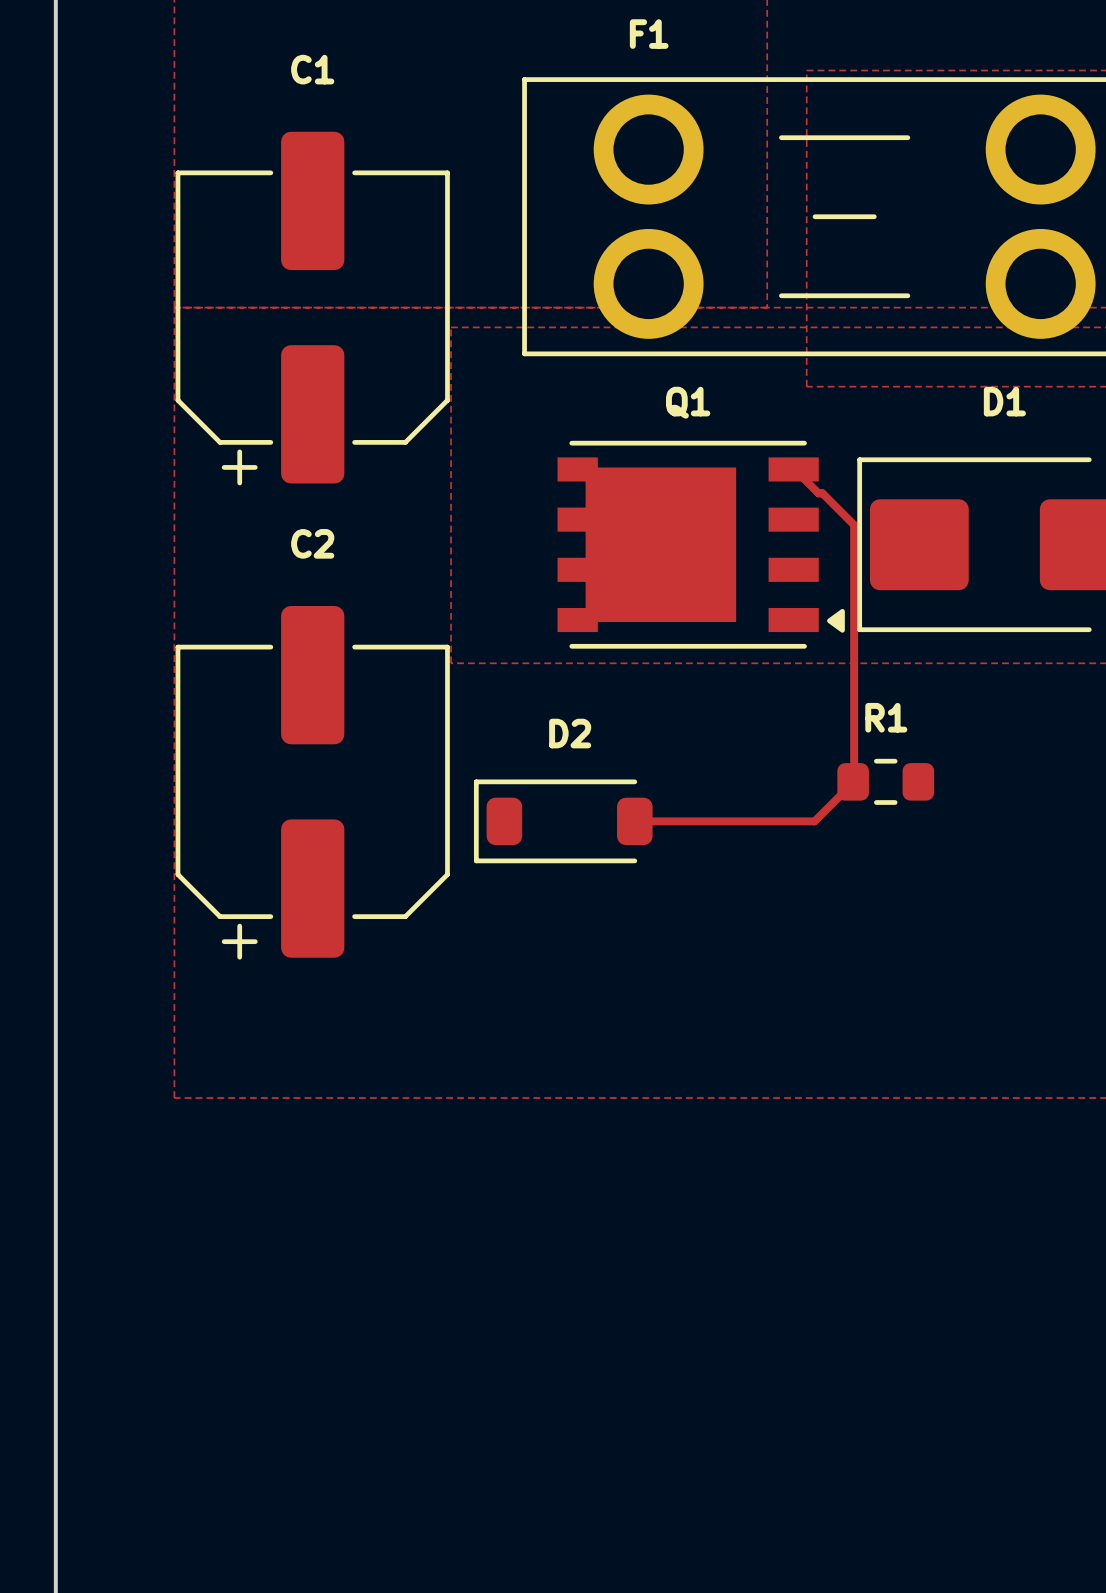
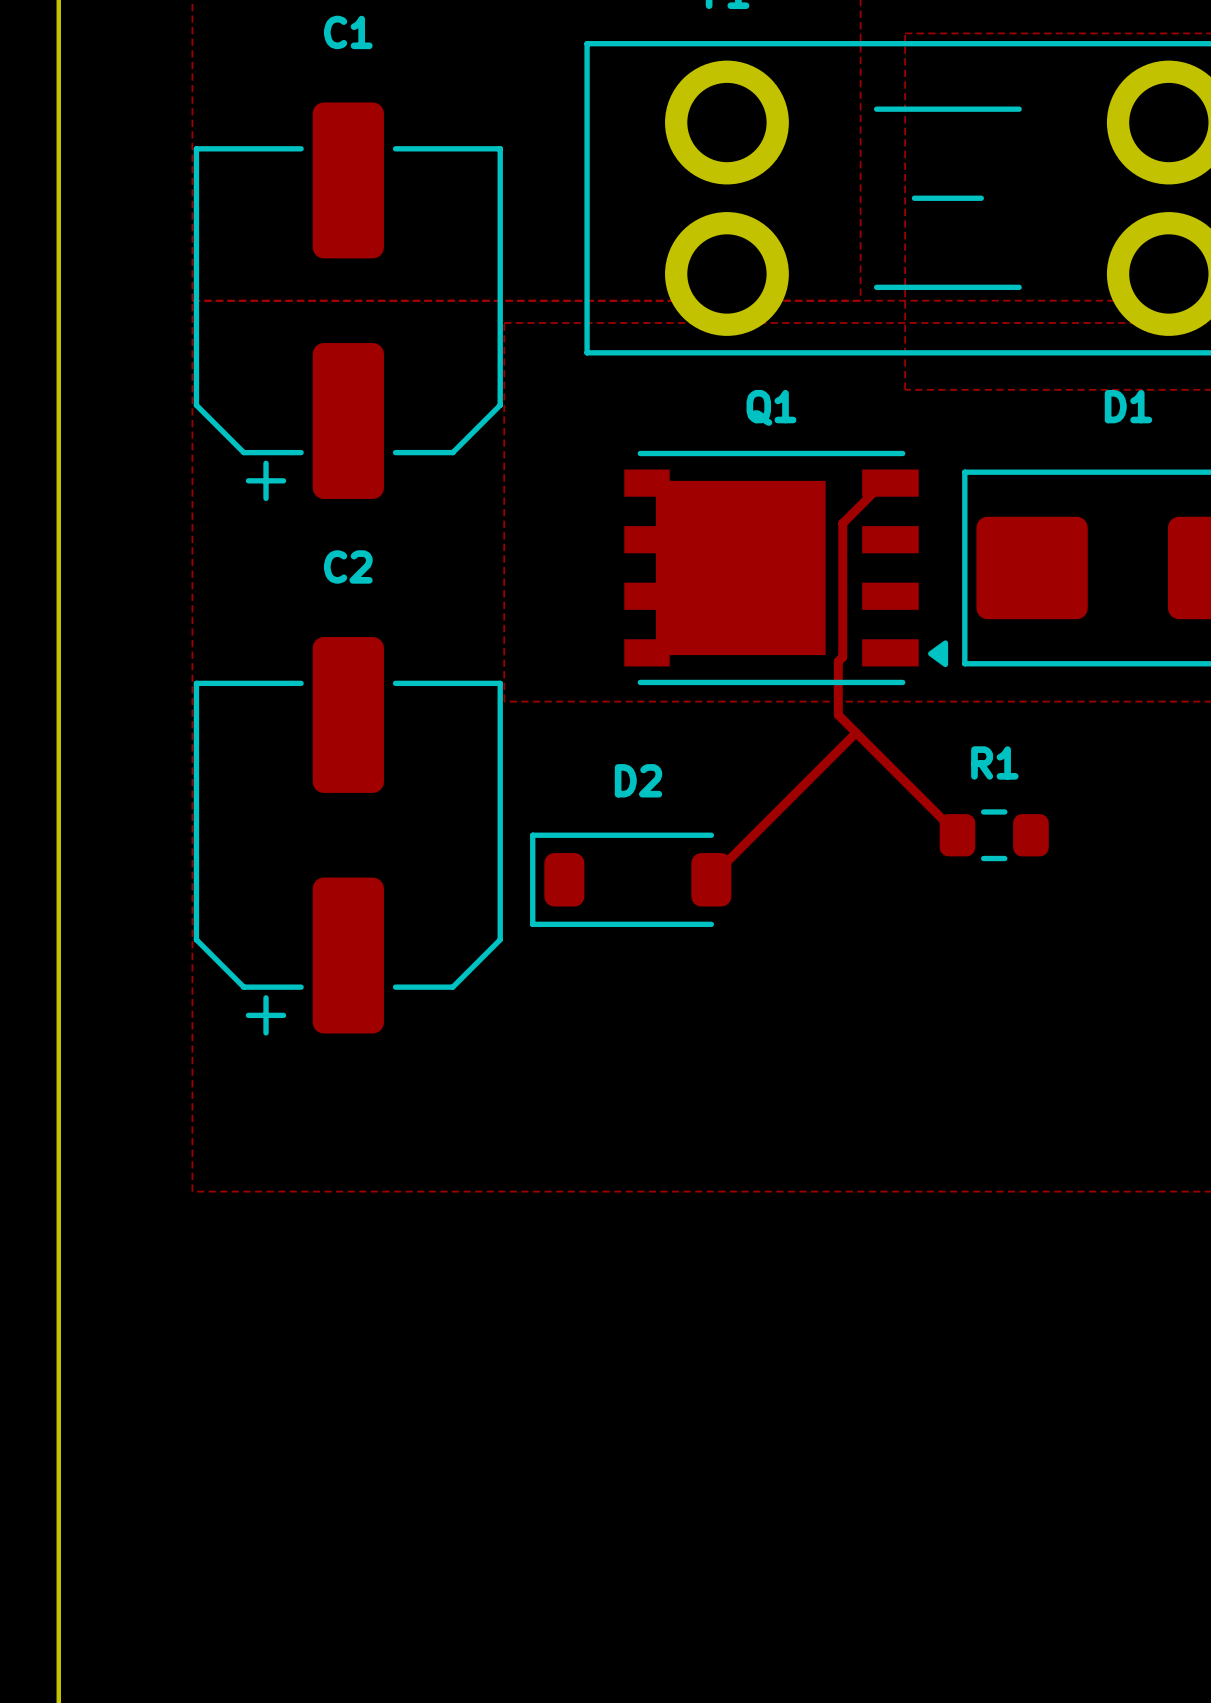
track: (794, 469) (818, 493) (822, 493) (854, 524) (854, 781) (814, 821) (634, 821) -> (891, 483) (882, 483) (842, 523) (842, 657) (838, 661) (838, 714) (958, 835)
track: none -> (856, 732) (709, 879)

